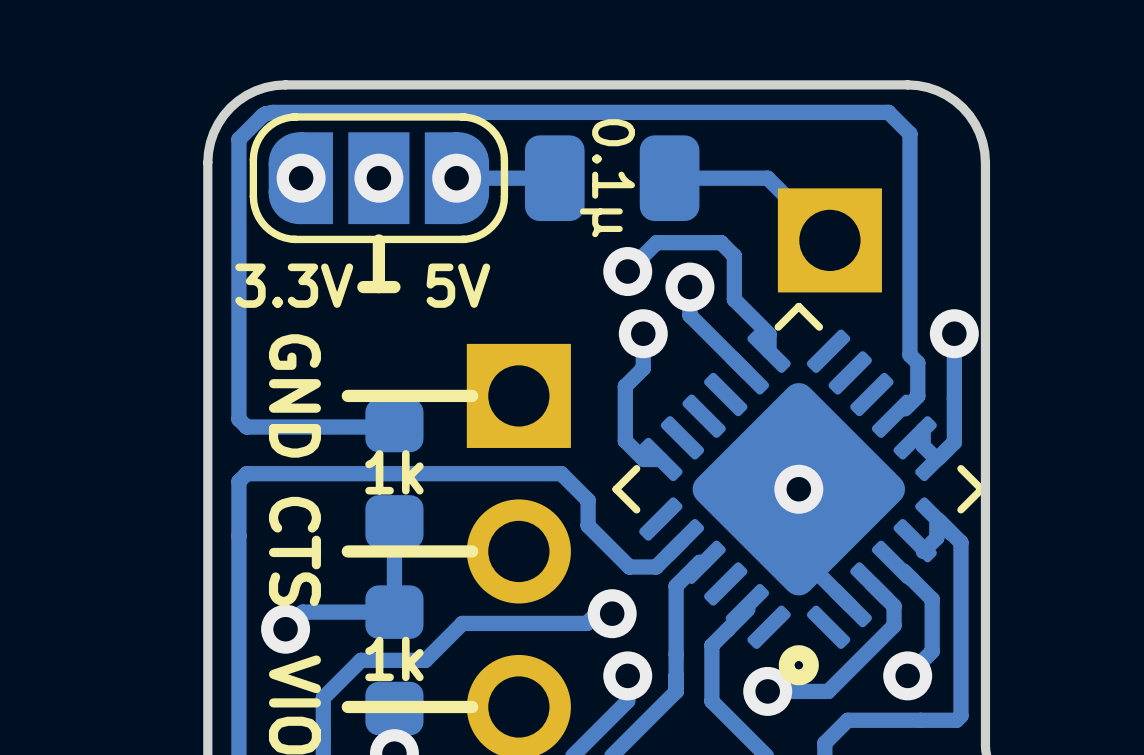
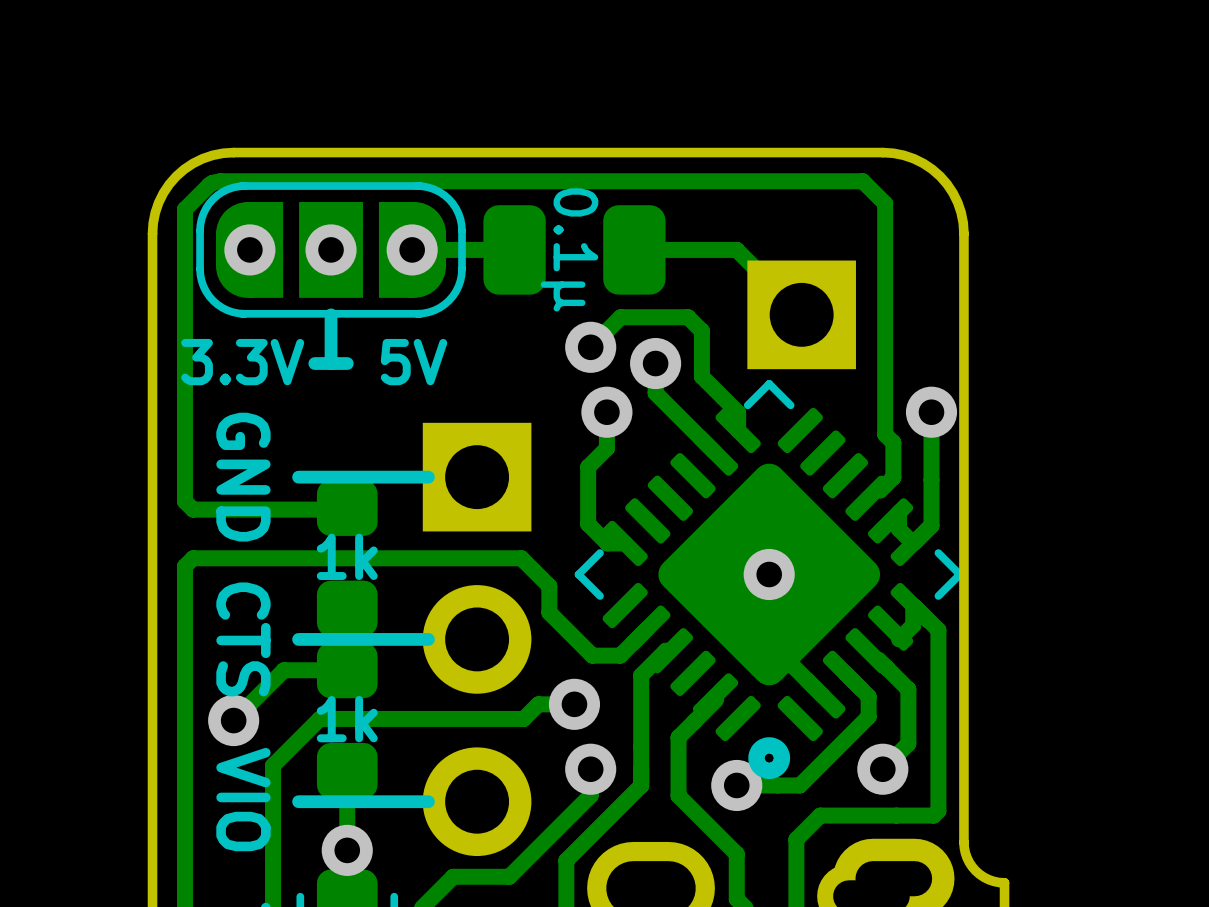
track: (394, 581) (394, 612) (302, 612) -> (347, 670) (283, 670) (251, 702)
track: (612, 598) (586, 623) (462, 623) (425, 660) (361, 660) (323, 698) -> (574, 704) (538, 704) (523, 718) (319, 718) (273, 765) (273, 792)
part position: (394, 660) -> (347, 720)

